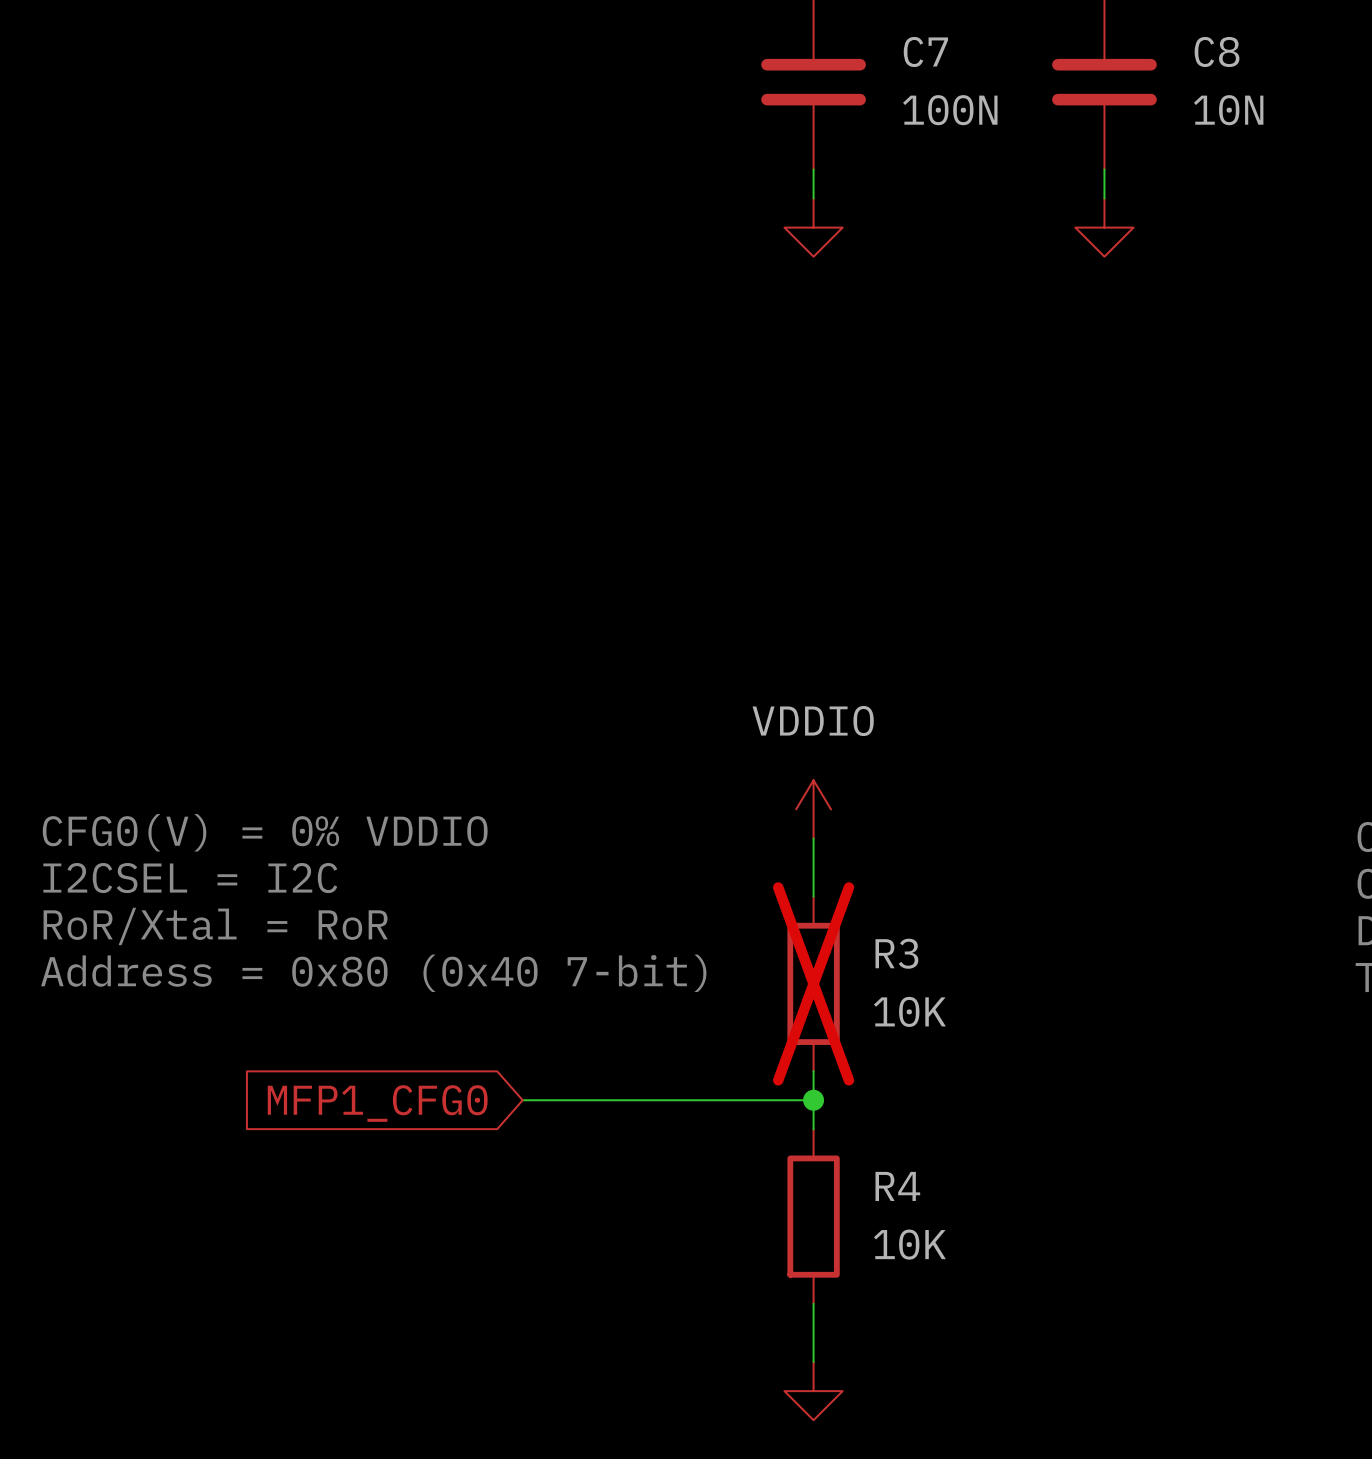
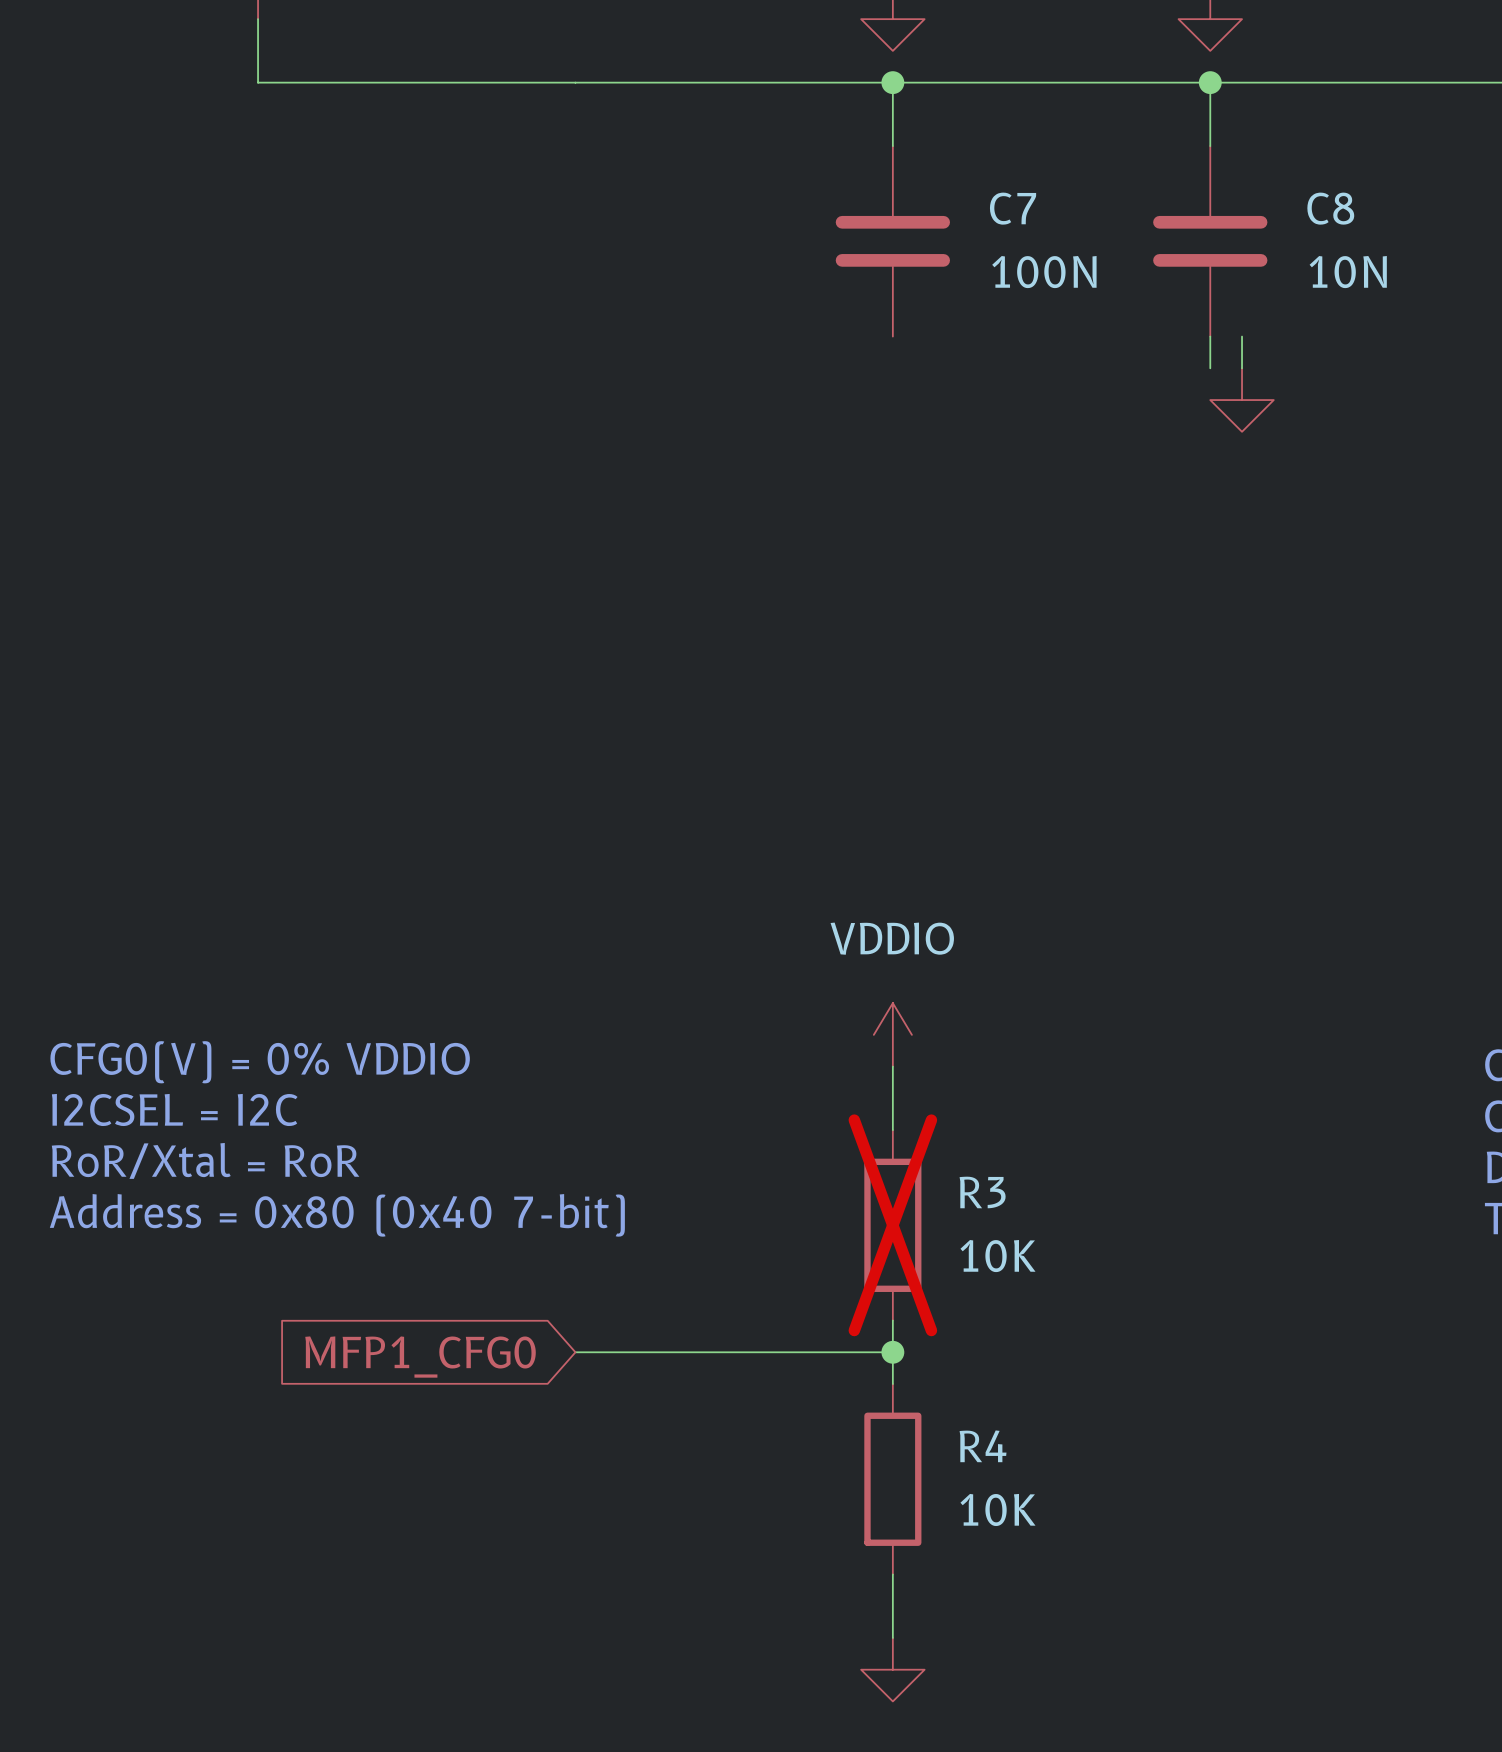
wire: (813, 169) (813, 198) -> (1242, 336) (1242, 368)
power symbol: (813, 227) -> none
power symbol position: (1104, 227) -> (1242, 400)

